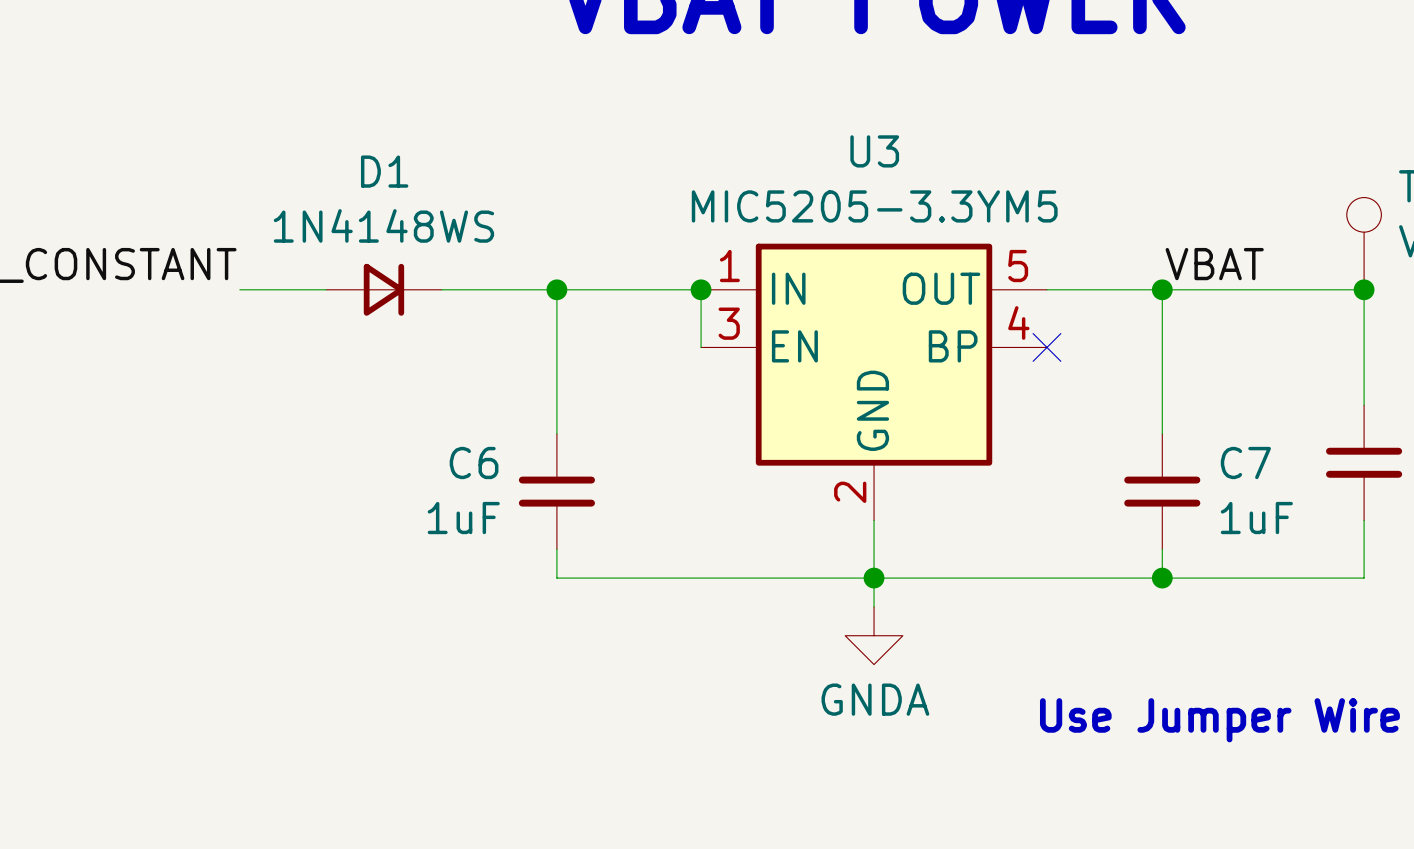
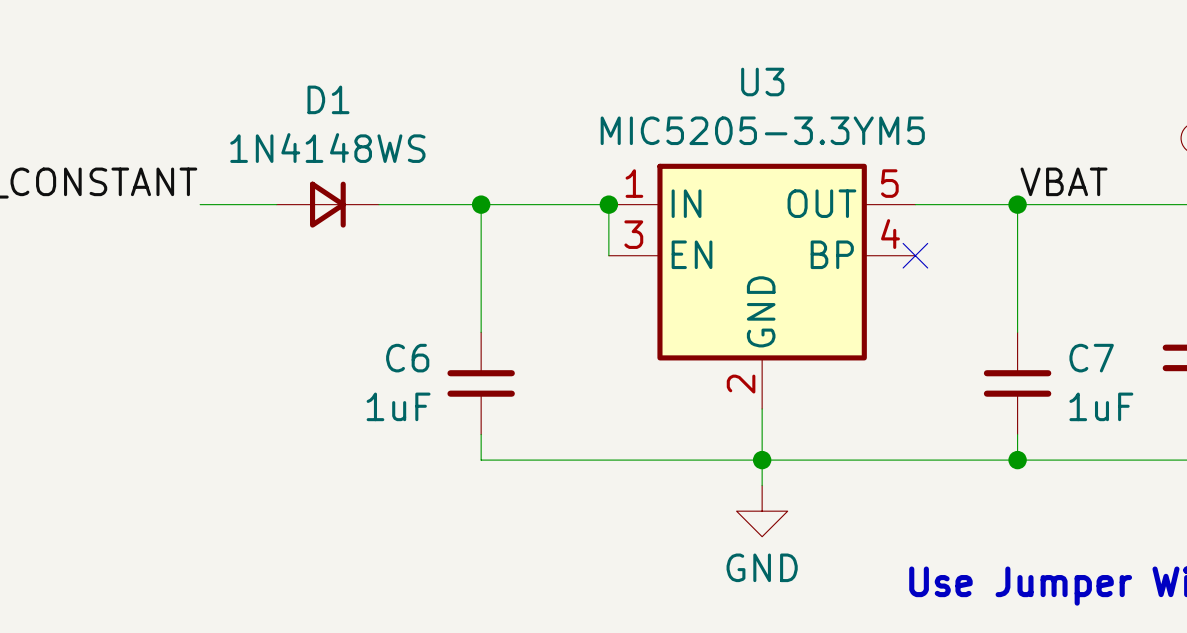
power symbol: GNDA (874, 635) -> GND (762, 511)

